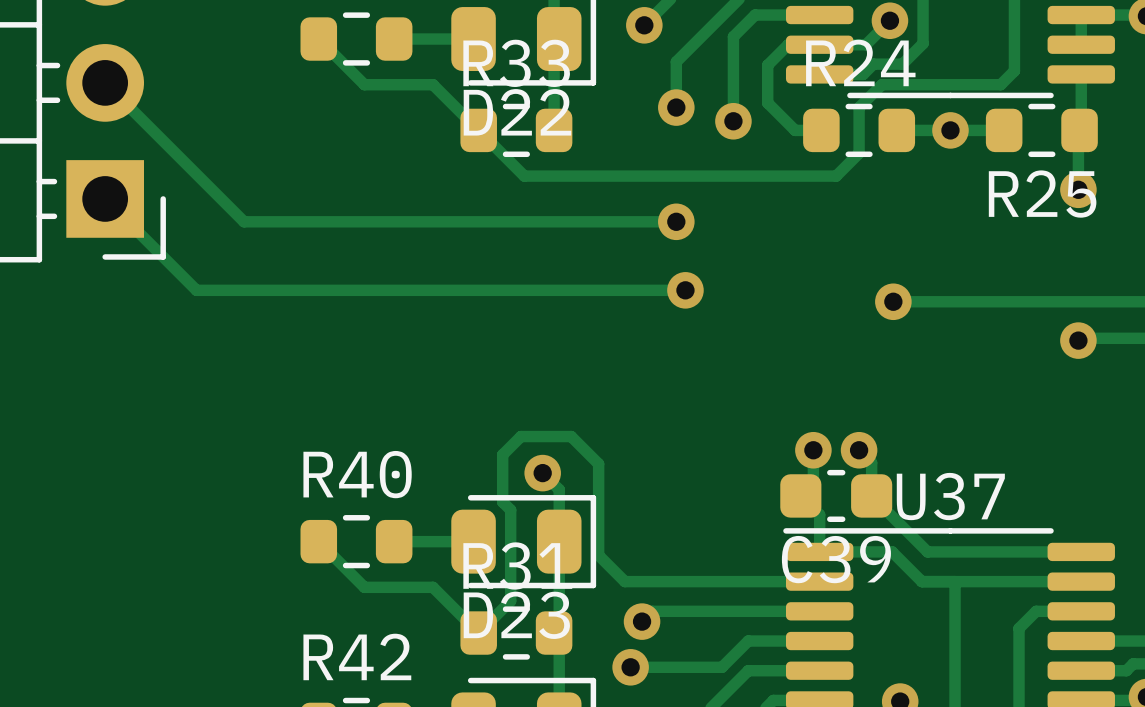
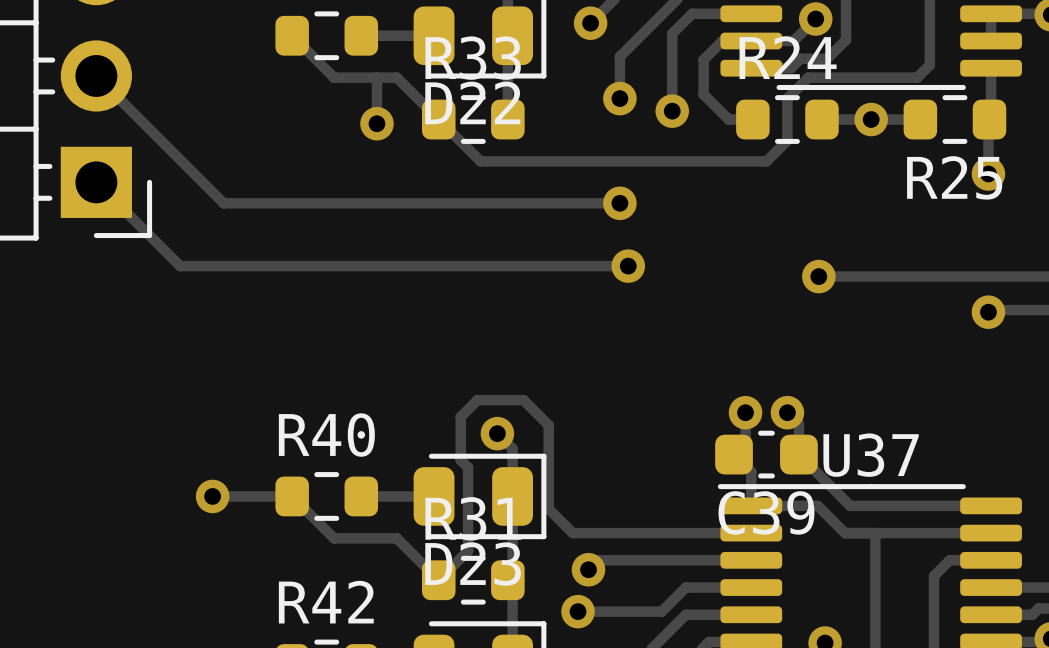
track: none -> (376, 77) (376, 123)
via: none -> (376, 123)
track: none -> (212, 496) (292, 496)
via: none -> (212, 496)

